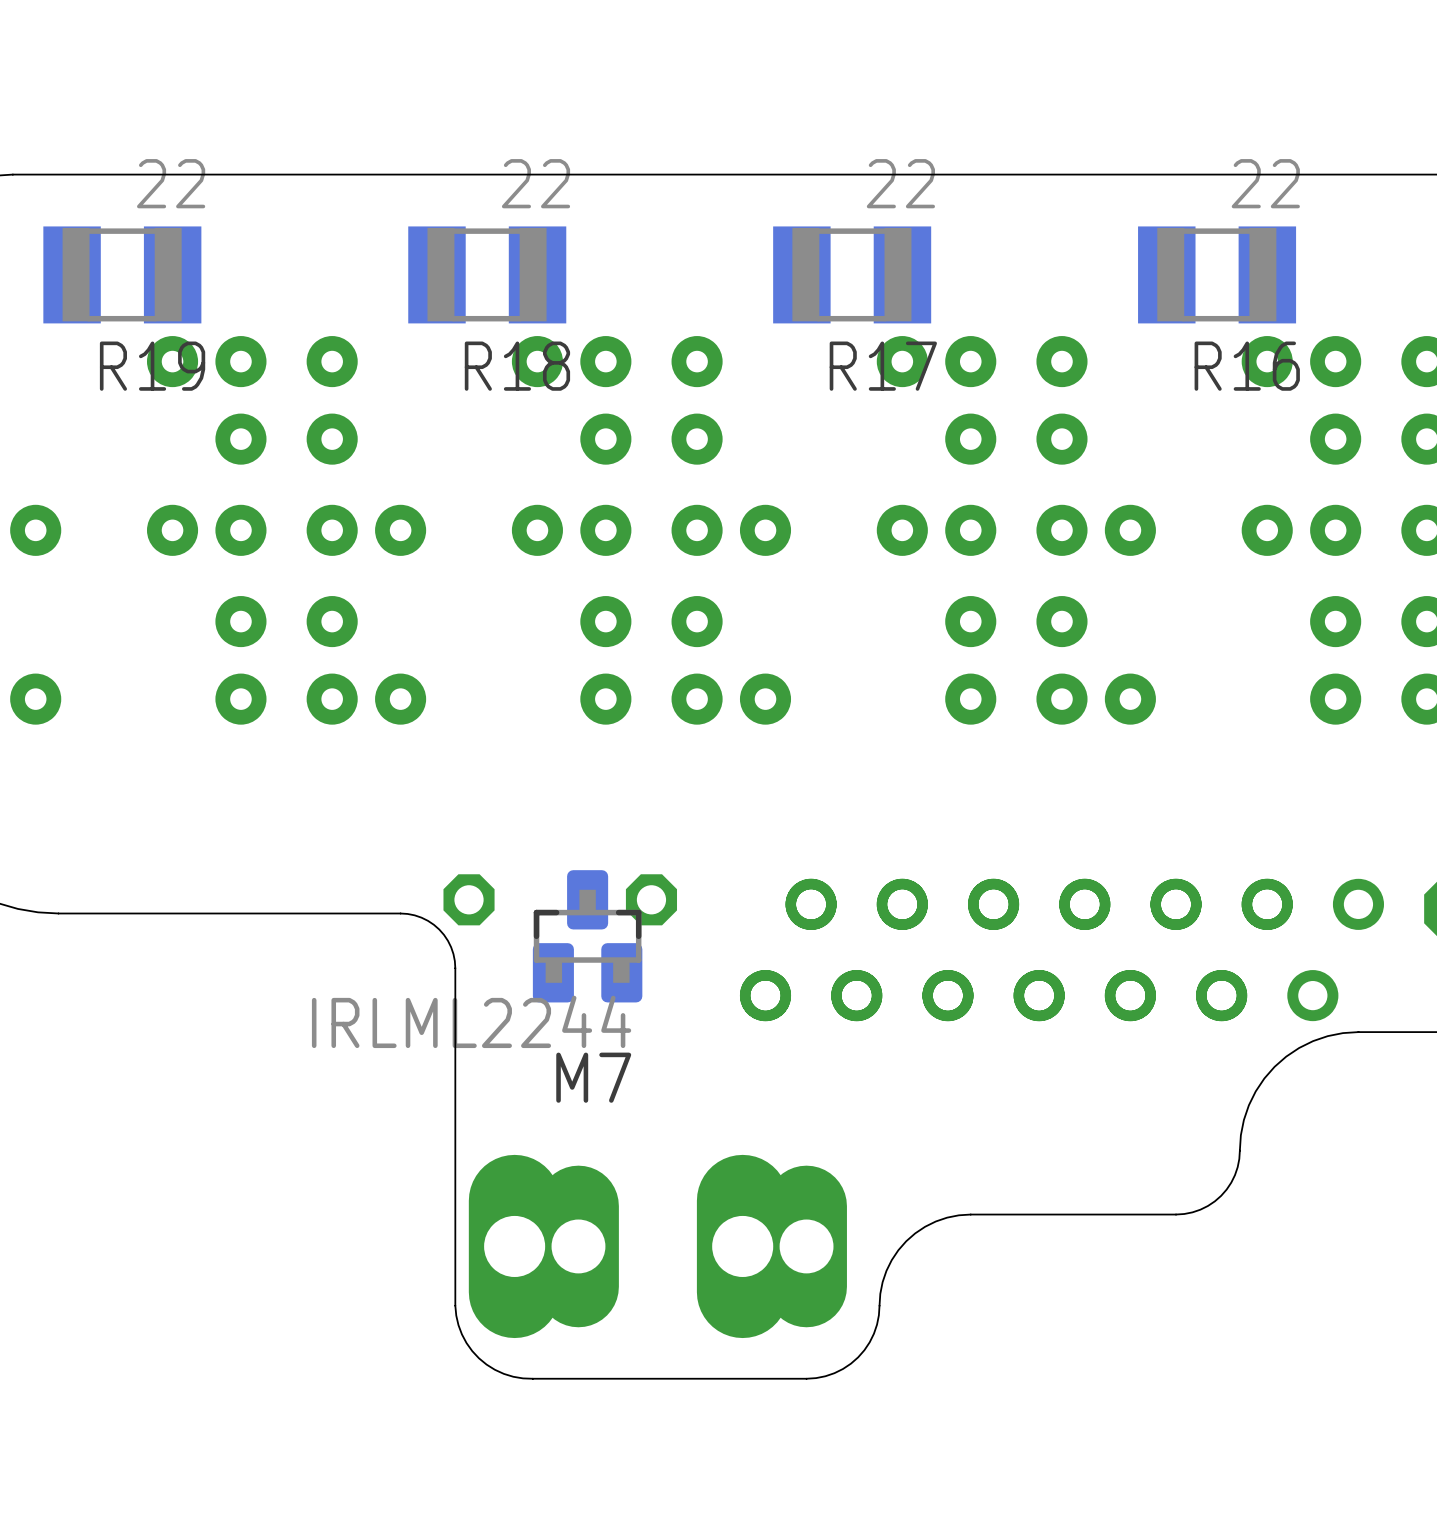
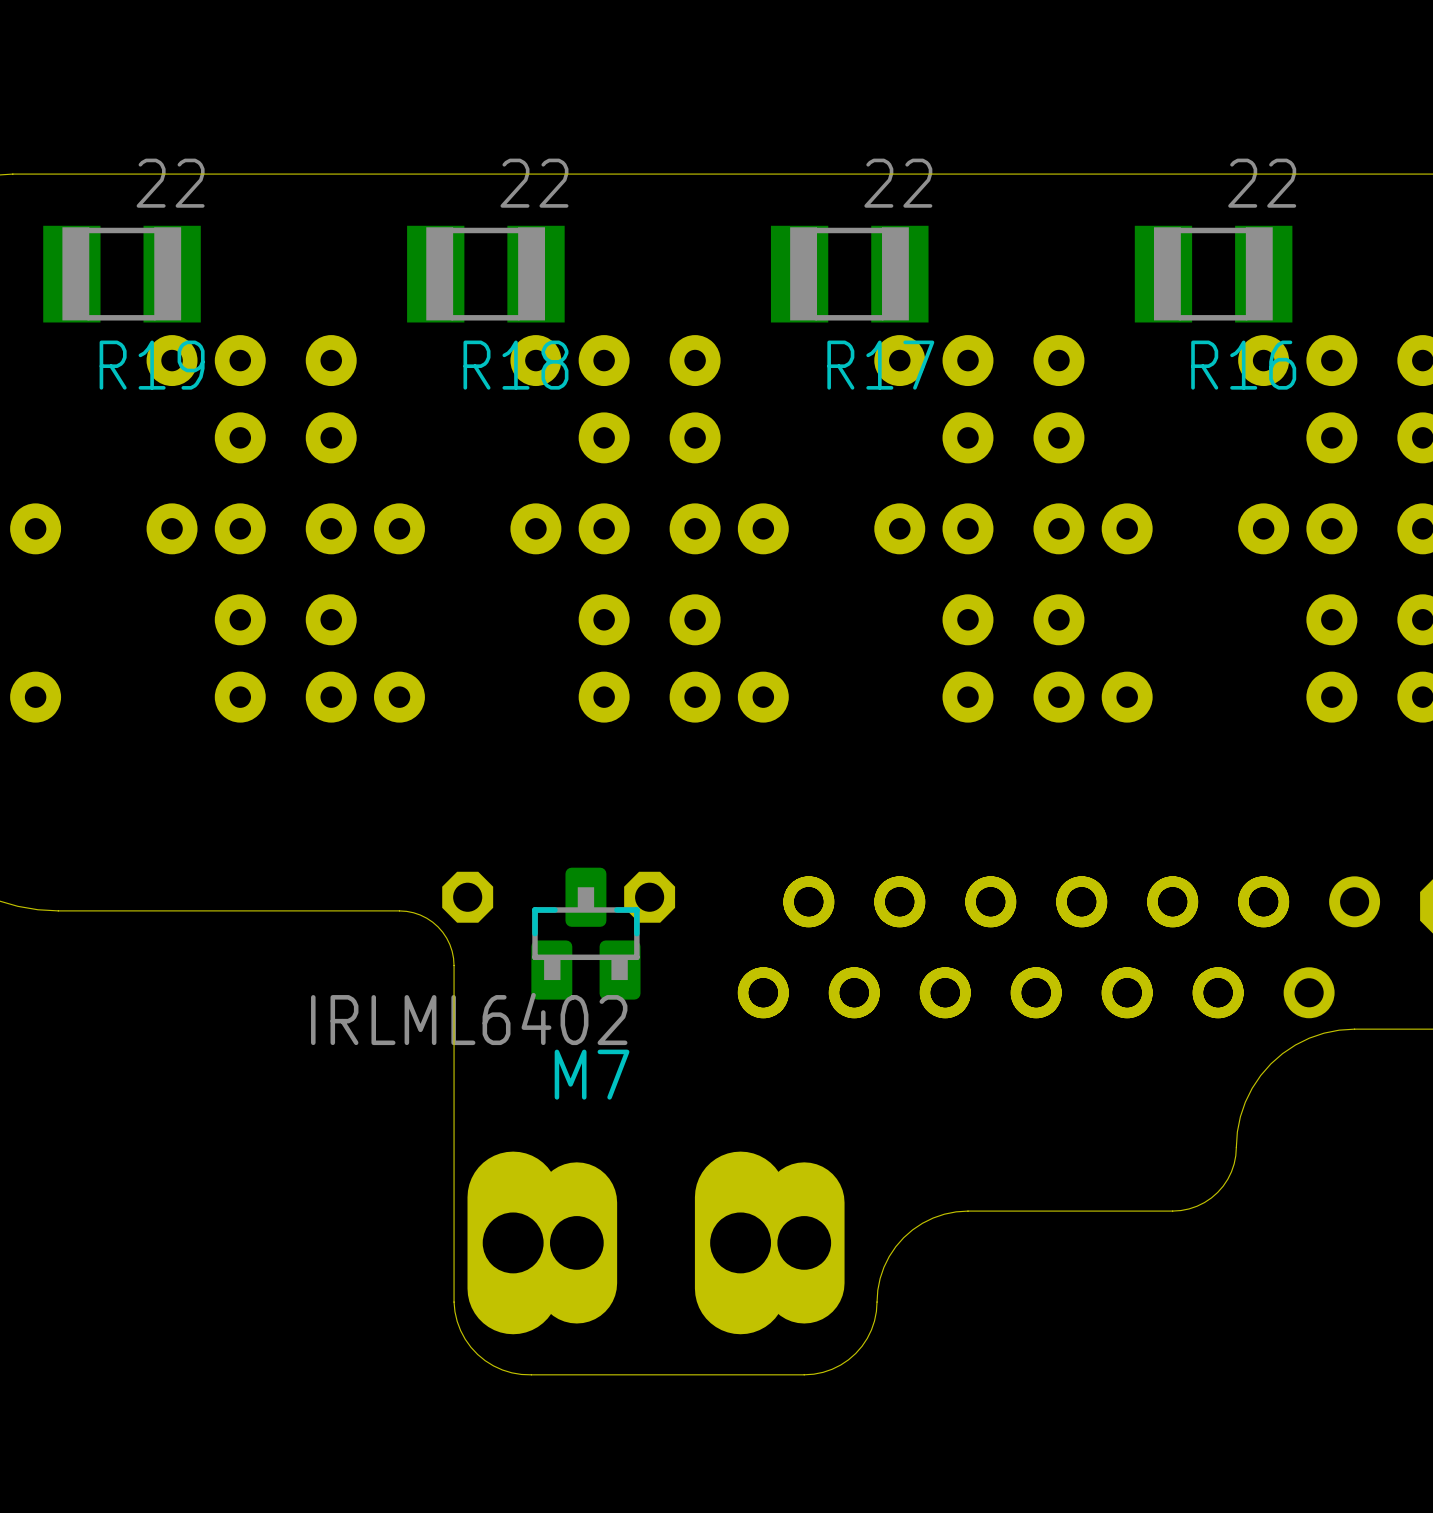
M7 value: IRLML2244 (471, 1021) -> IRLML6402 (469, 1018)

